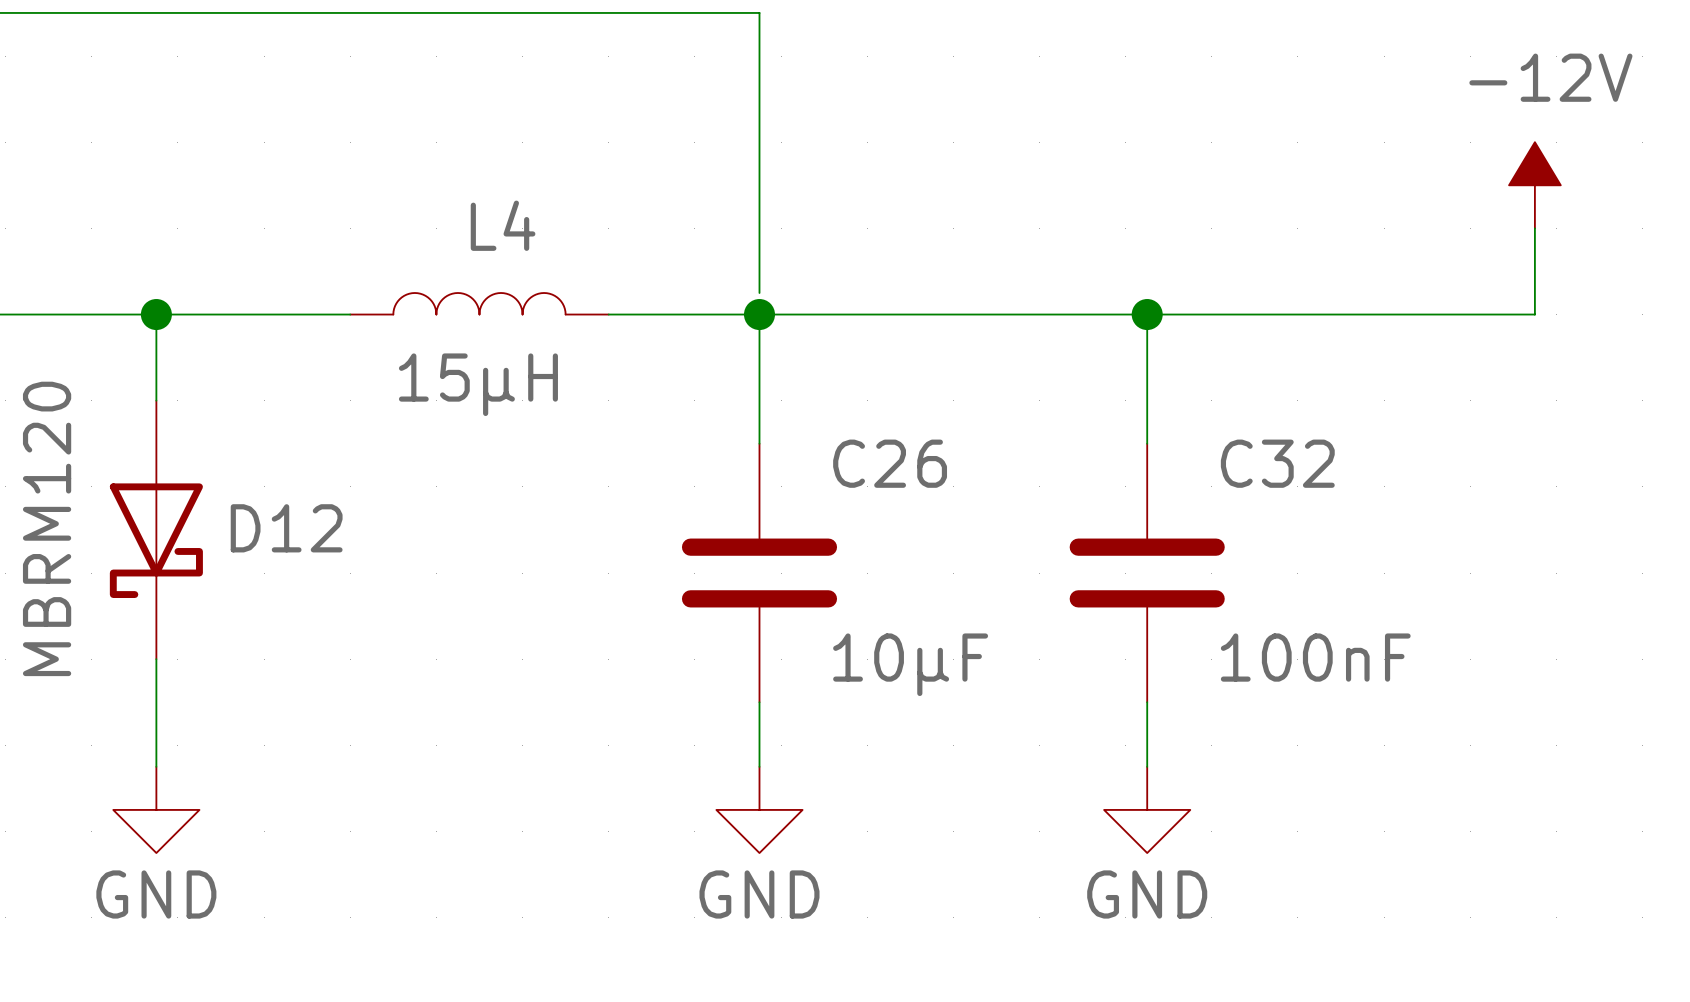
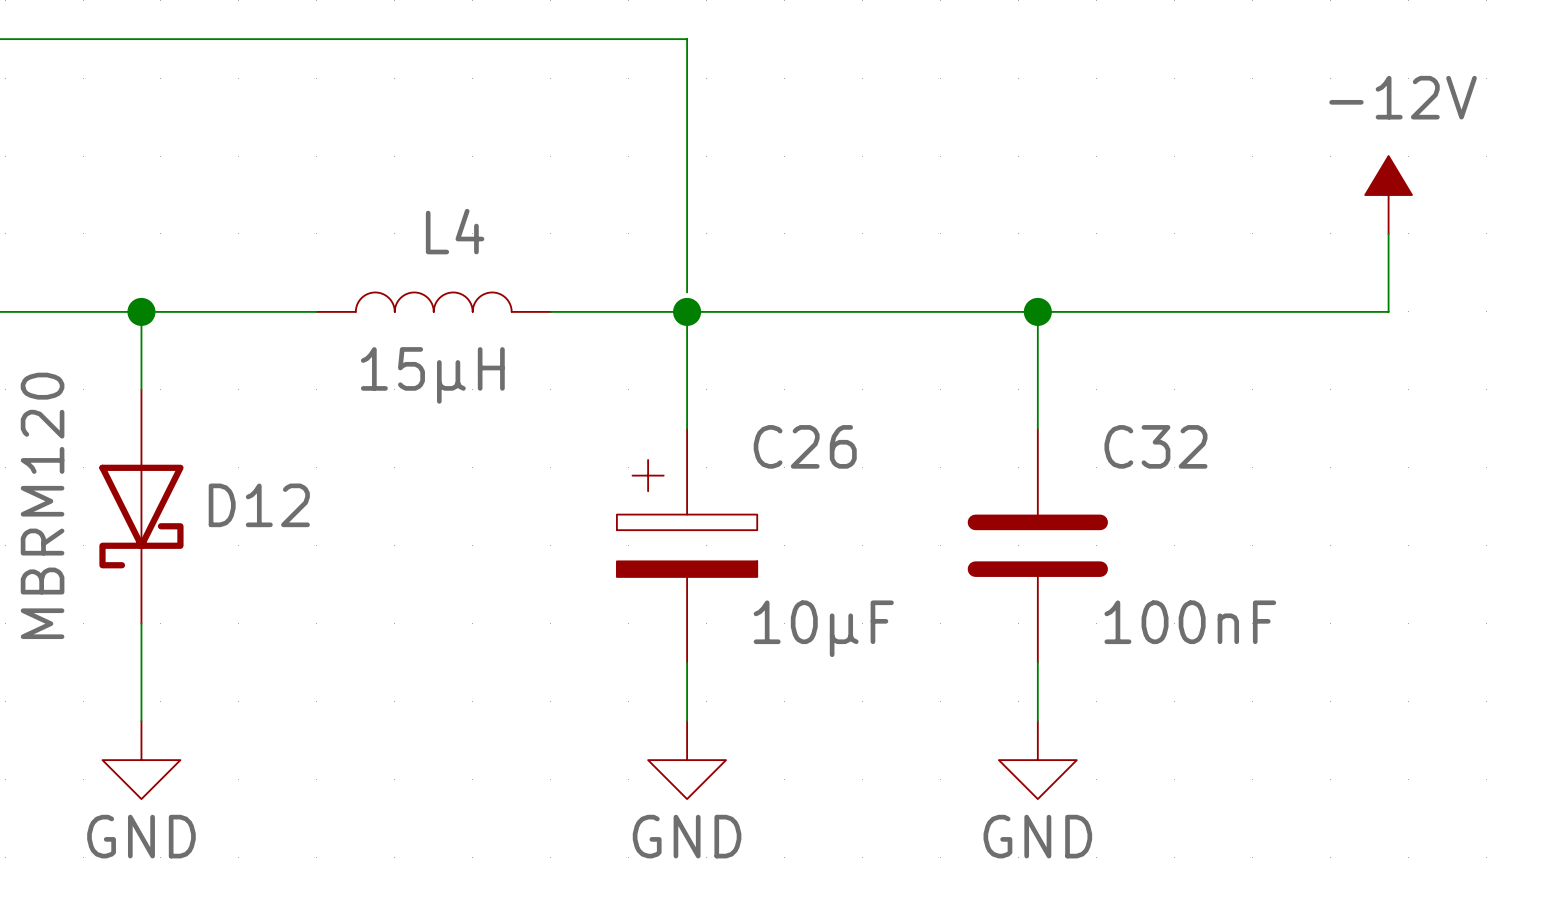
C26 symbol: [681, 443, 838, 703] -> [616, 428, 758, 663]

